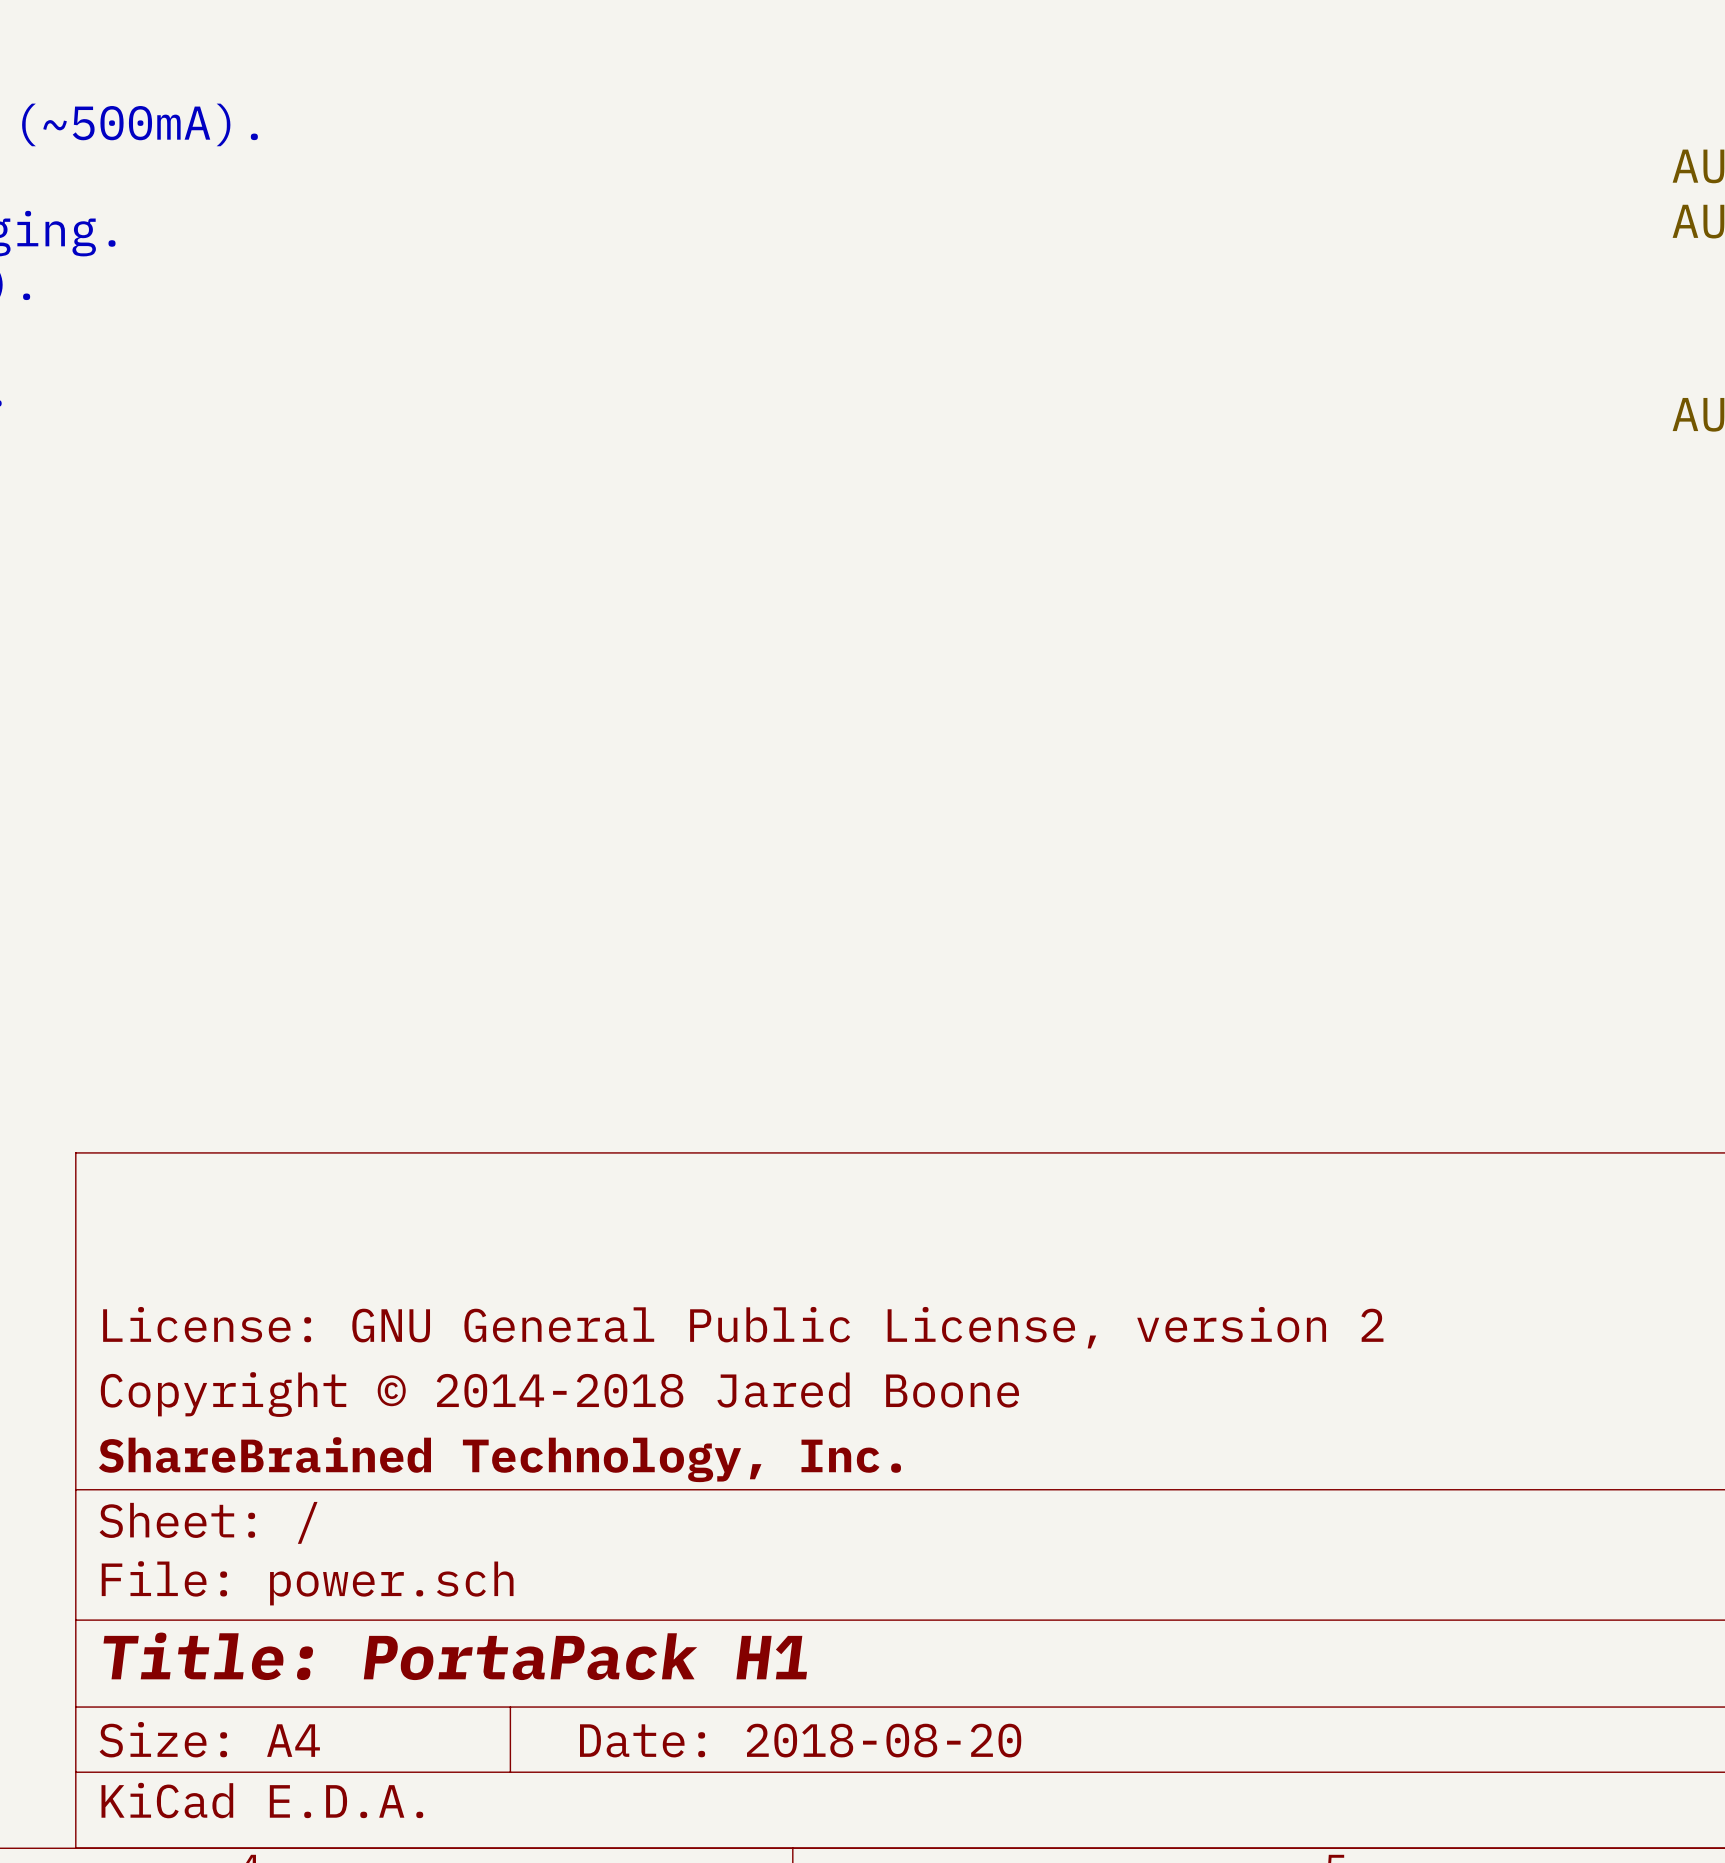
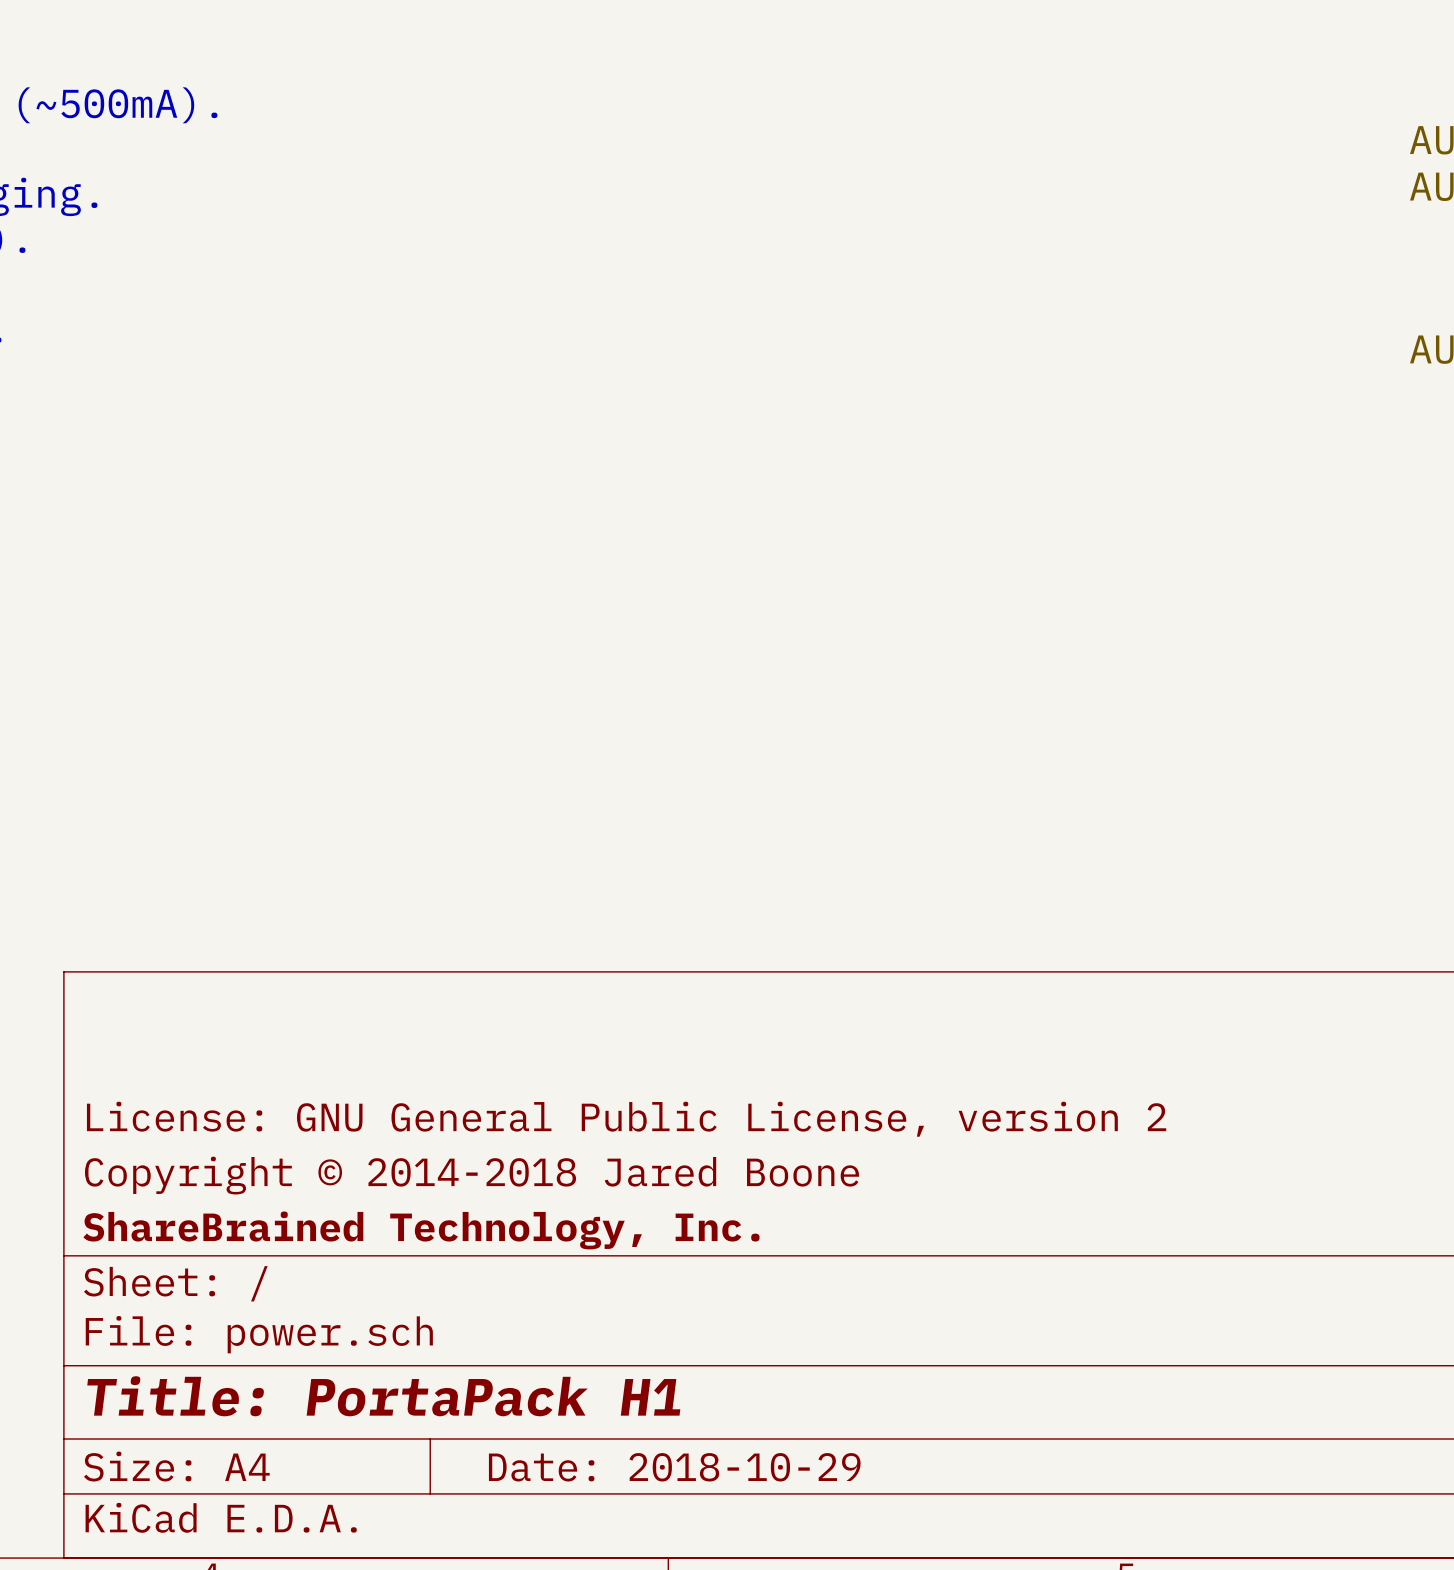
title block: Date: 2018-08-20 (800, 1740) -> Date: 2018-10-29 (674, 1467)

